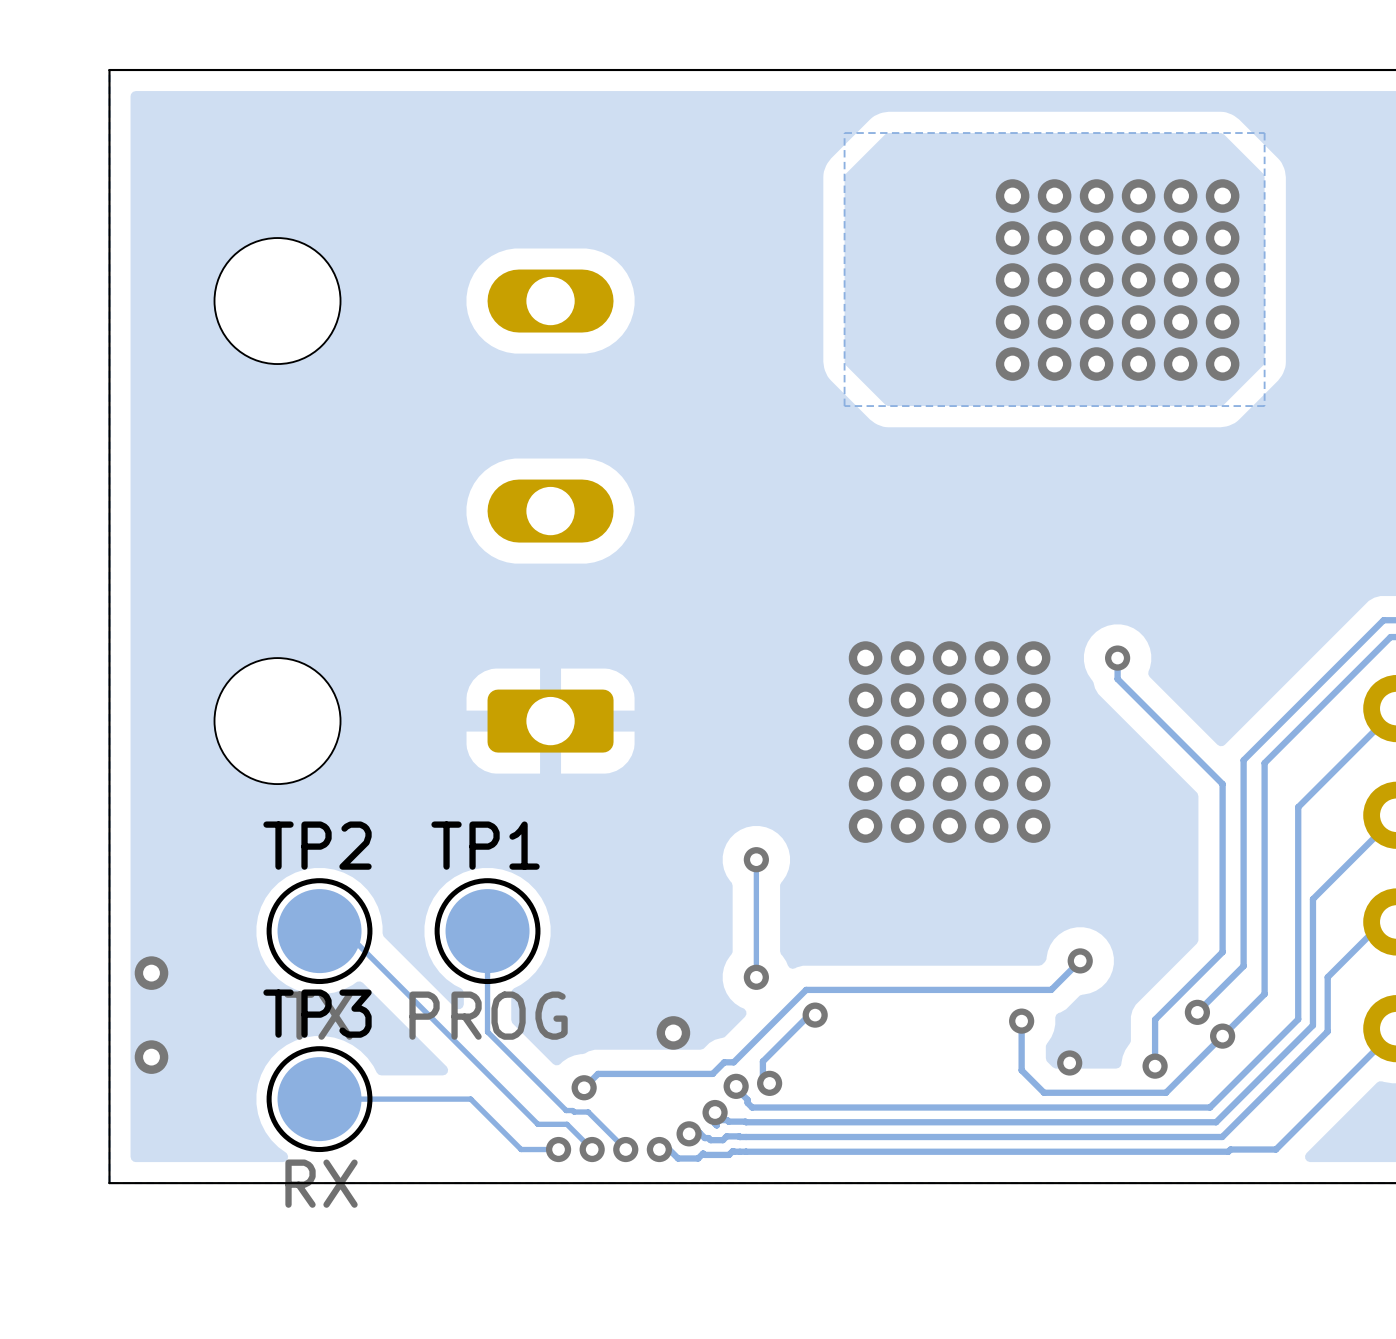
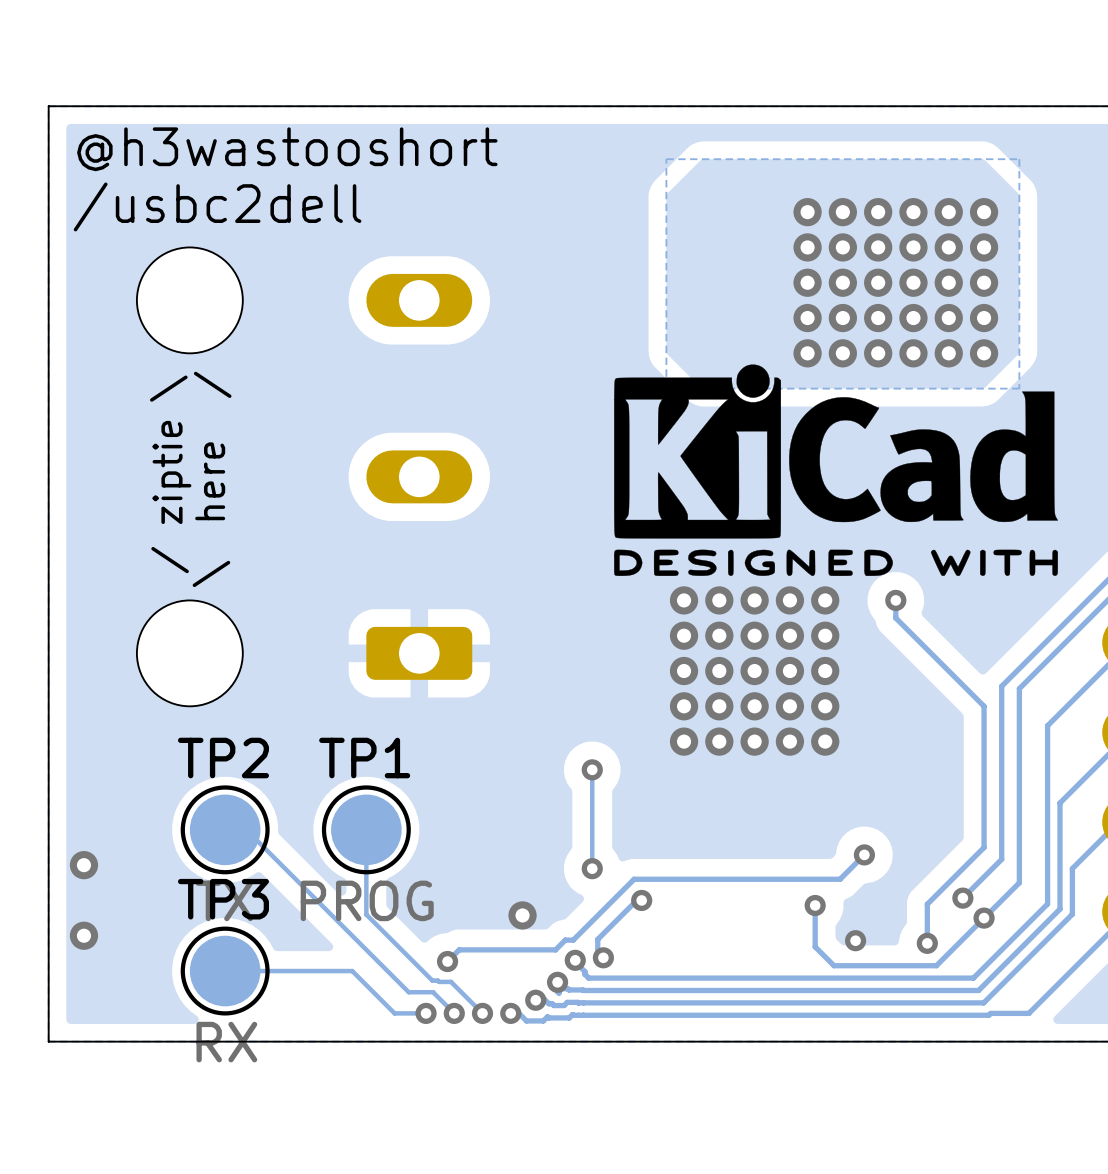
text: none -> @h3wastooshort (287, 149)
text: none -> /usbc2dell (217, 206)
drawing: none -> [614, 364, 1058, 576]
text: none -> / ziptie \ (170, 474)
text: none -> \ here / (212, 479)

